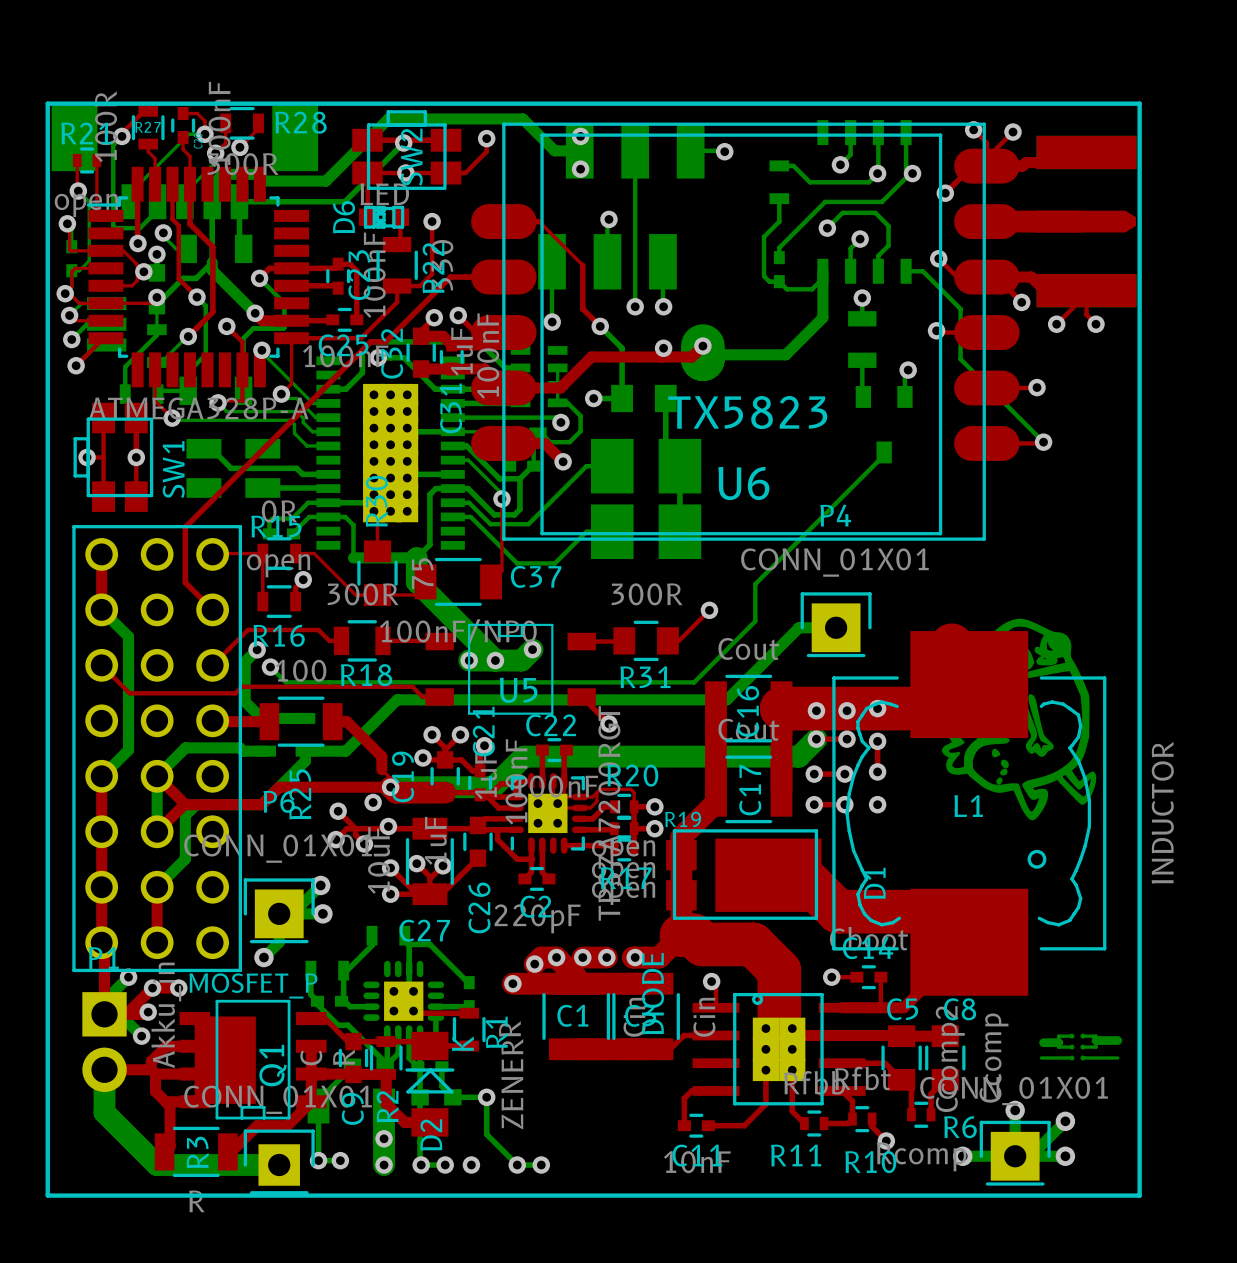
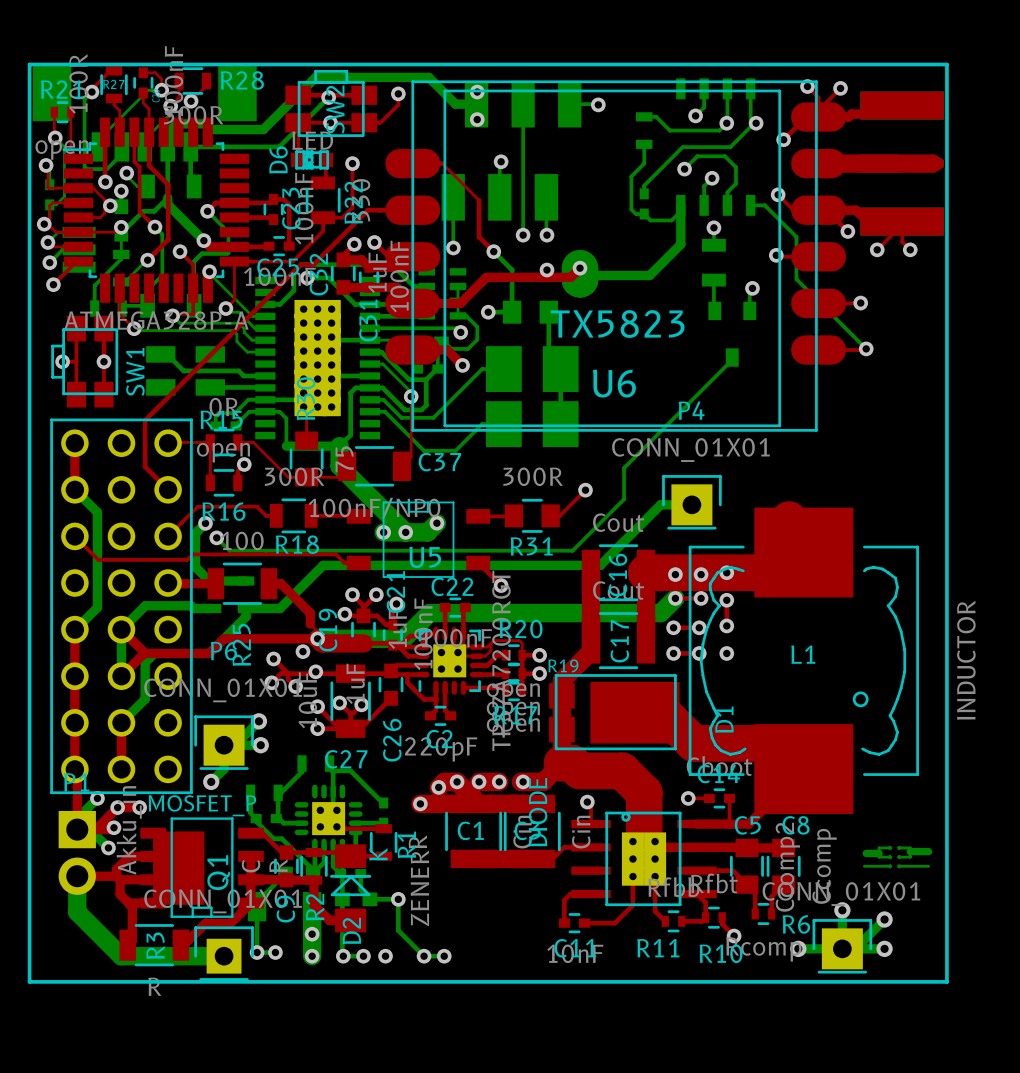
drawing: [934, 618, 1097, 821] -> none

